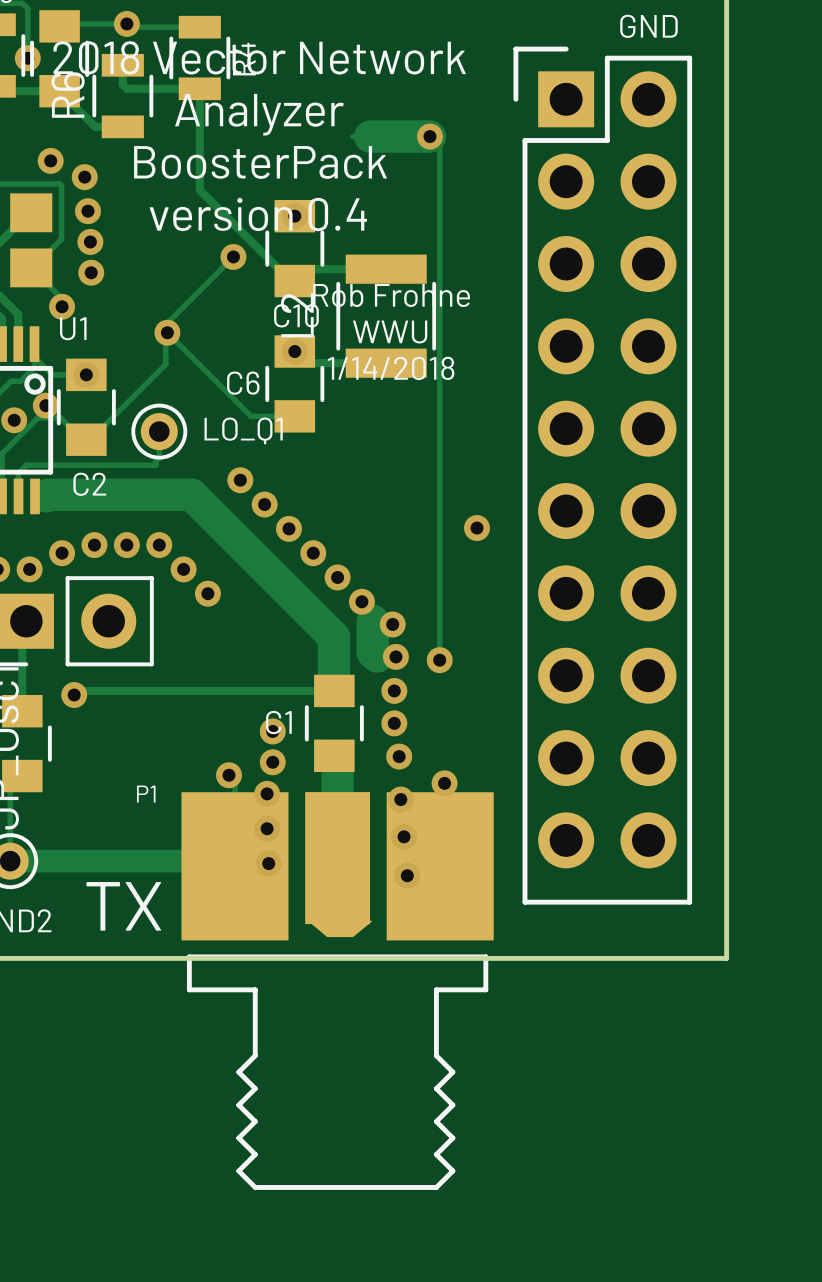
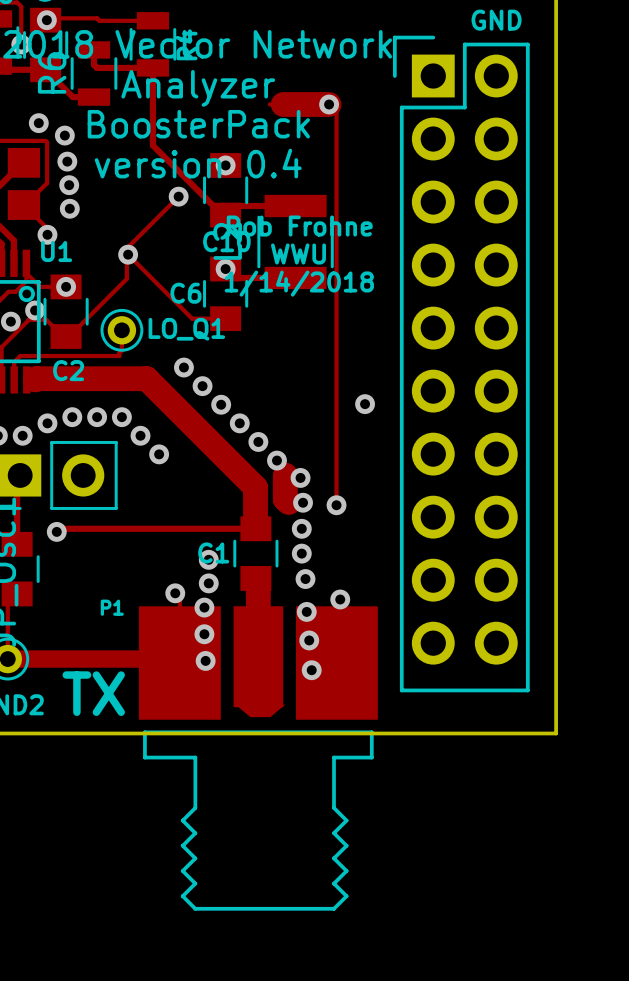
via position: (126, 23) -> (46, 20)

